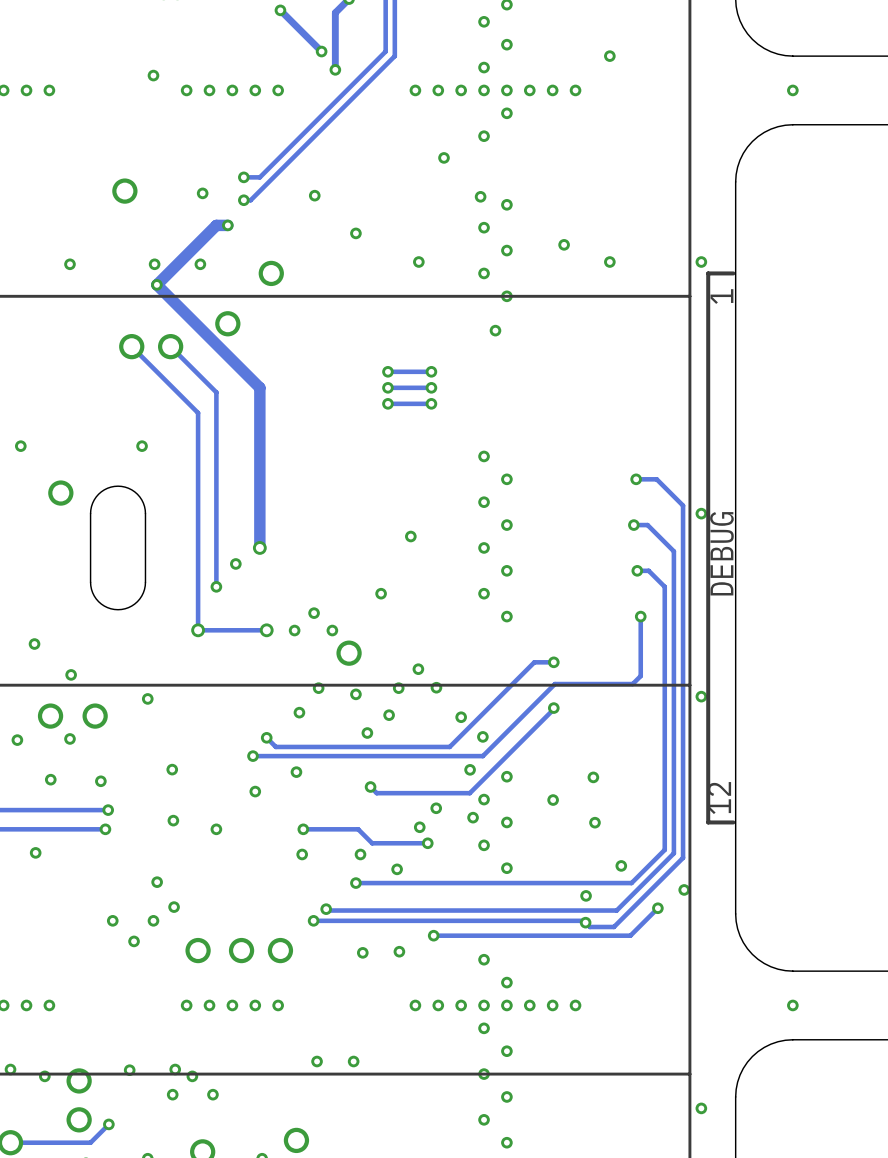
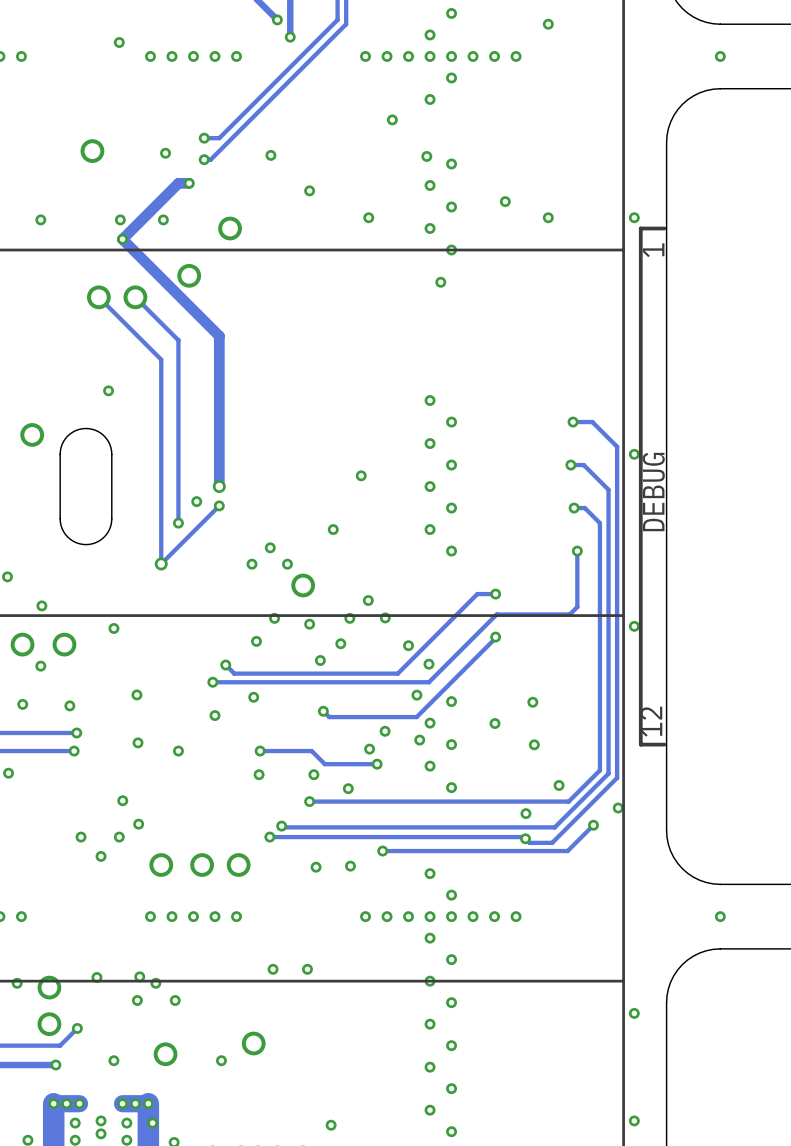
via: (387, 371) -> none
track: (431, 371) (387, 371) -> none
via: (431, 371) -> none
via: (387, 387) -> none
track: (431, 387) (387, 387) -> none
via: (431, 387) -> none
via: (387, 403) -> none
track: (431, 403) (387, 403) -> none
via: (431, 403) -> none
via: none -> (219, 505)
track: (266, 630) (198, 630) -> (219, 505) (161, 563)
via: (266, 630) -> none

